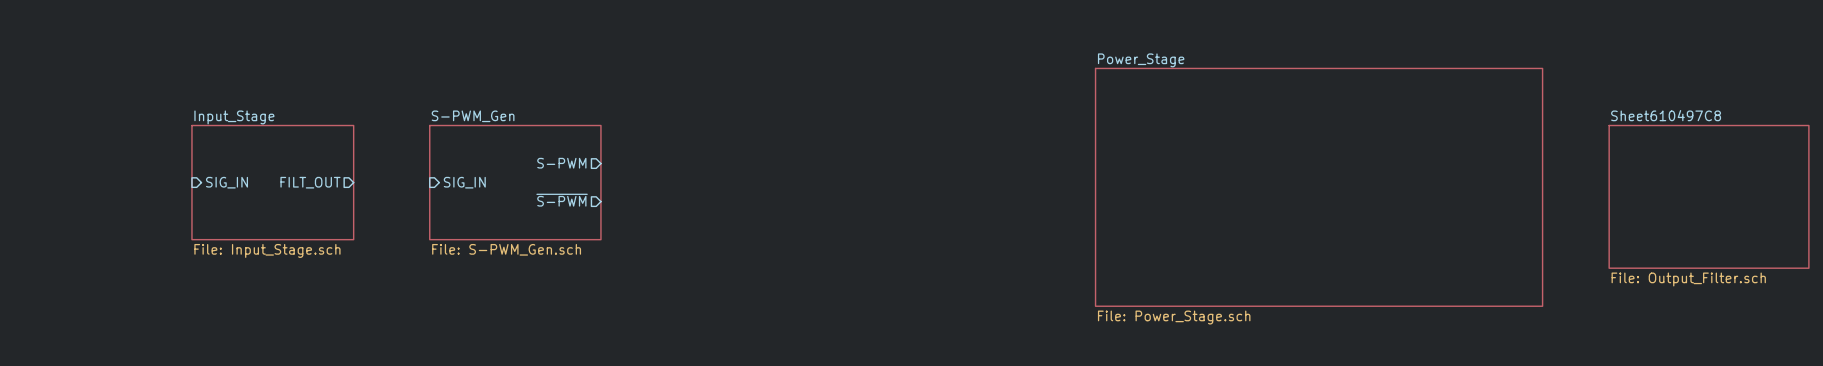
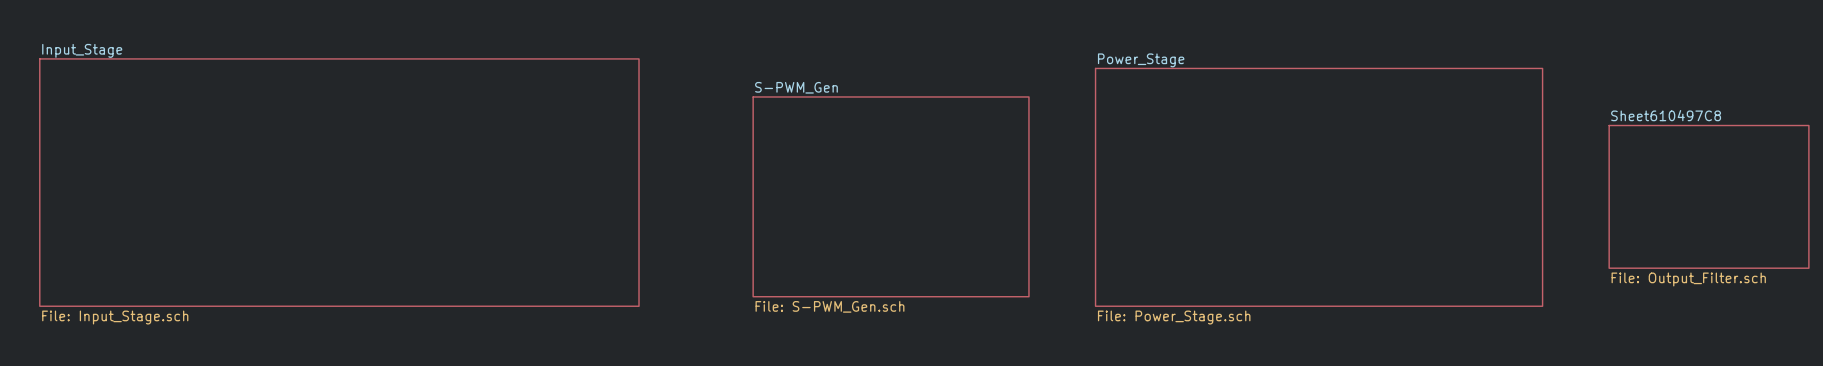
sheet pin: S-PWM (561, 163) -> none
sheet pin: SIG_IN (226, 182) -> none
sheet Input_Stage: File: Input_Stage.sch (272, 182) -> none
sheet pin: FILT_OUT (310, 182) -> none
sheet Input_Stage: none -> File: Input_Stage.sch (339, 182)
sheet pin: SIG_IN (464, 182) -> none
sheet S-PWM_Gen: File: S-PWM_Gen.sch (515, 182) -> none
sheet S-PWM_Gen: none -> File: S-PWM_Gen.sch (891, 196)
sheet pin: ~{S-PWM} (562, 200) -> none

